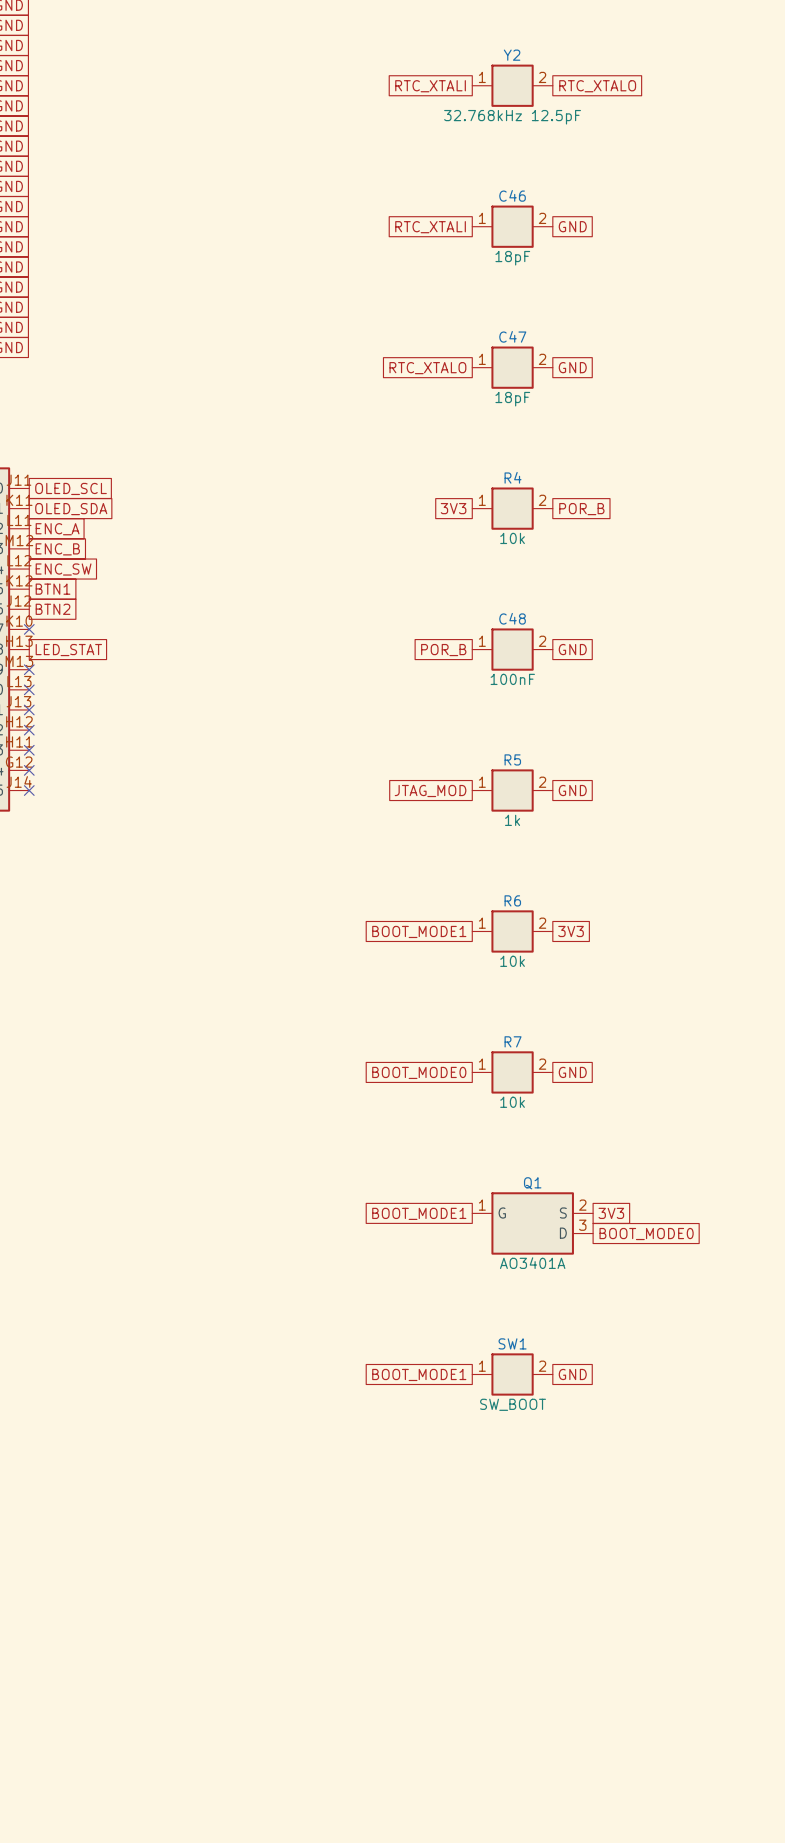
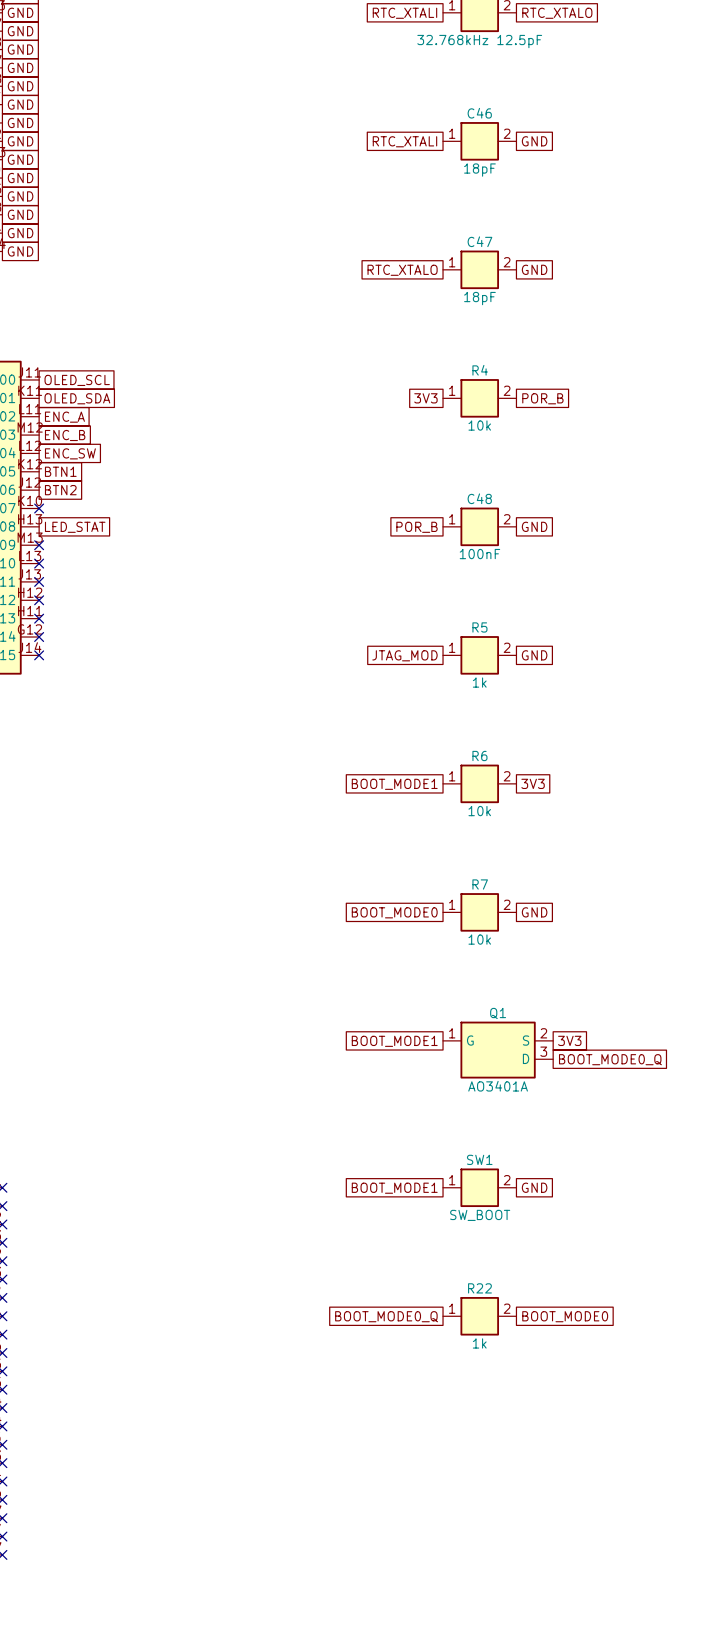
global label: BOOT_MODE0 (646, 1234) -> BOOT_MODE0_Q (610, 1059)
global label: none -> BOOT_MODE0_Q (386, 1316)
R22: none -> 1k (479, 1316)
global label: none -> BOOT_MODE0 (565, 1316)

